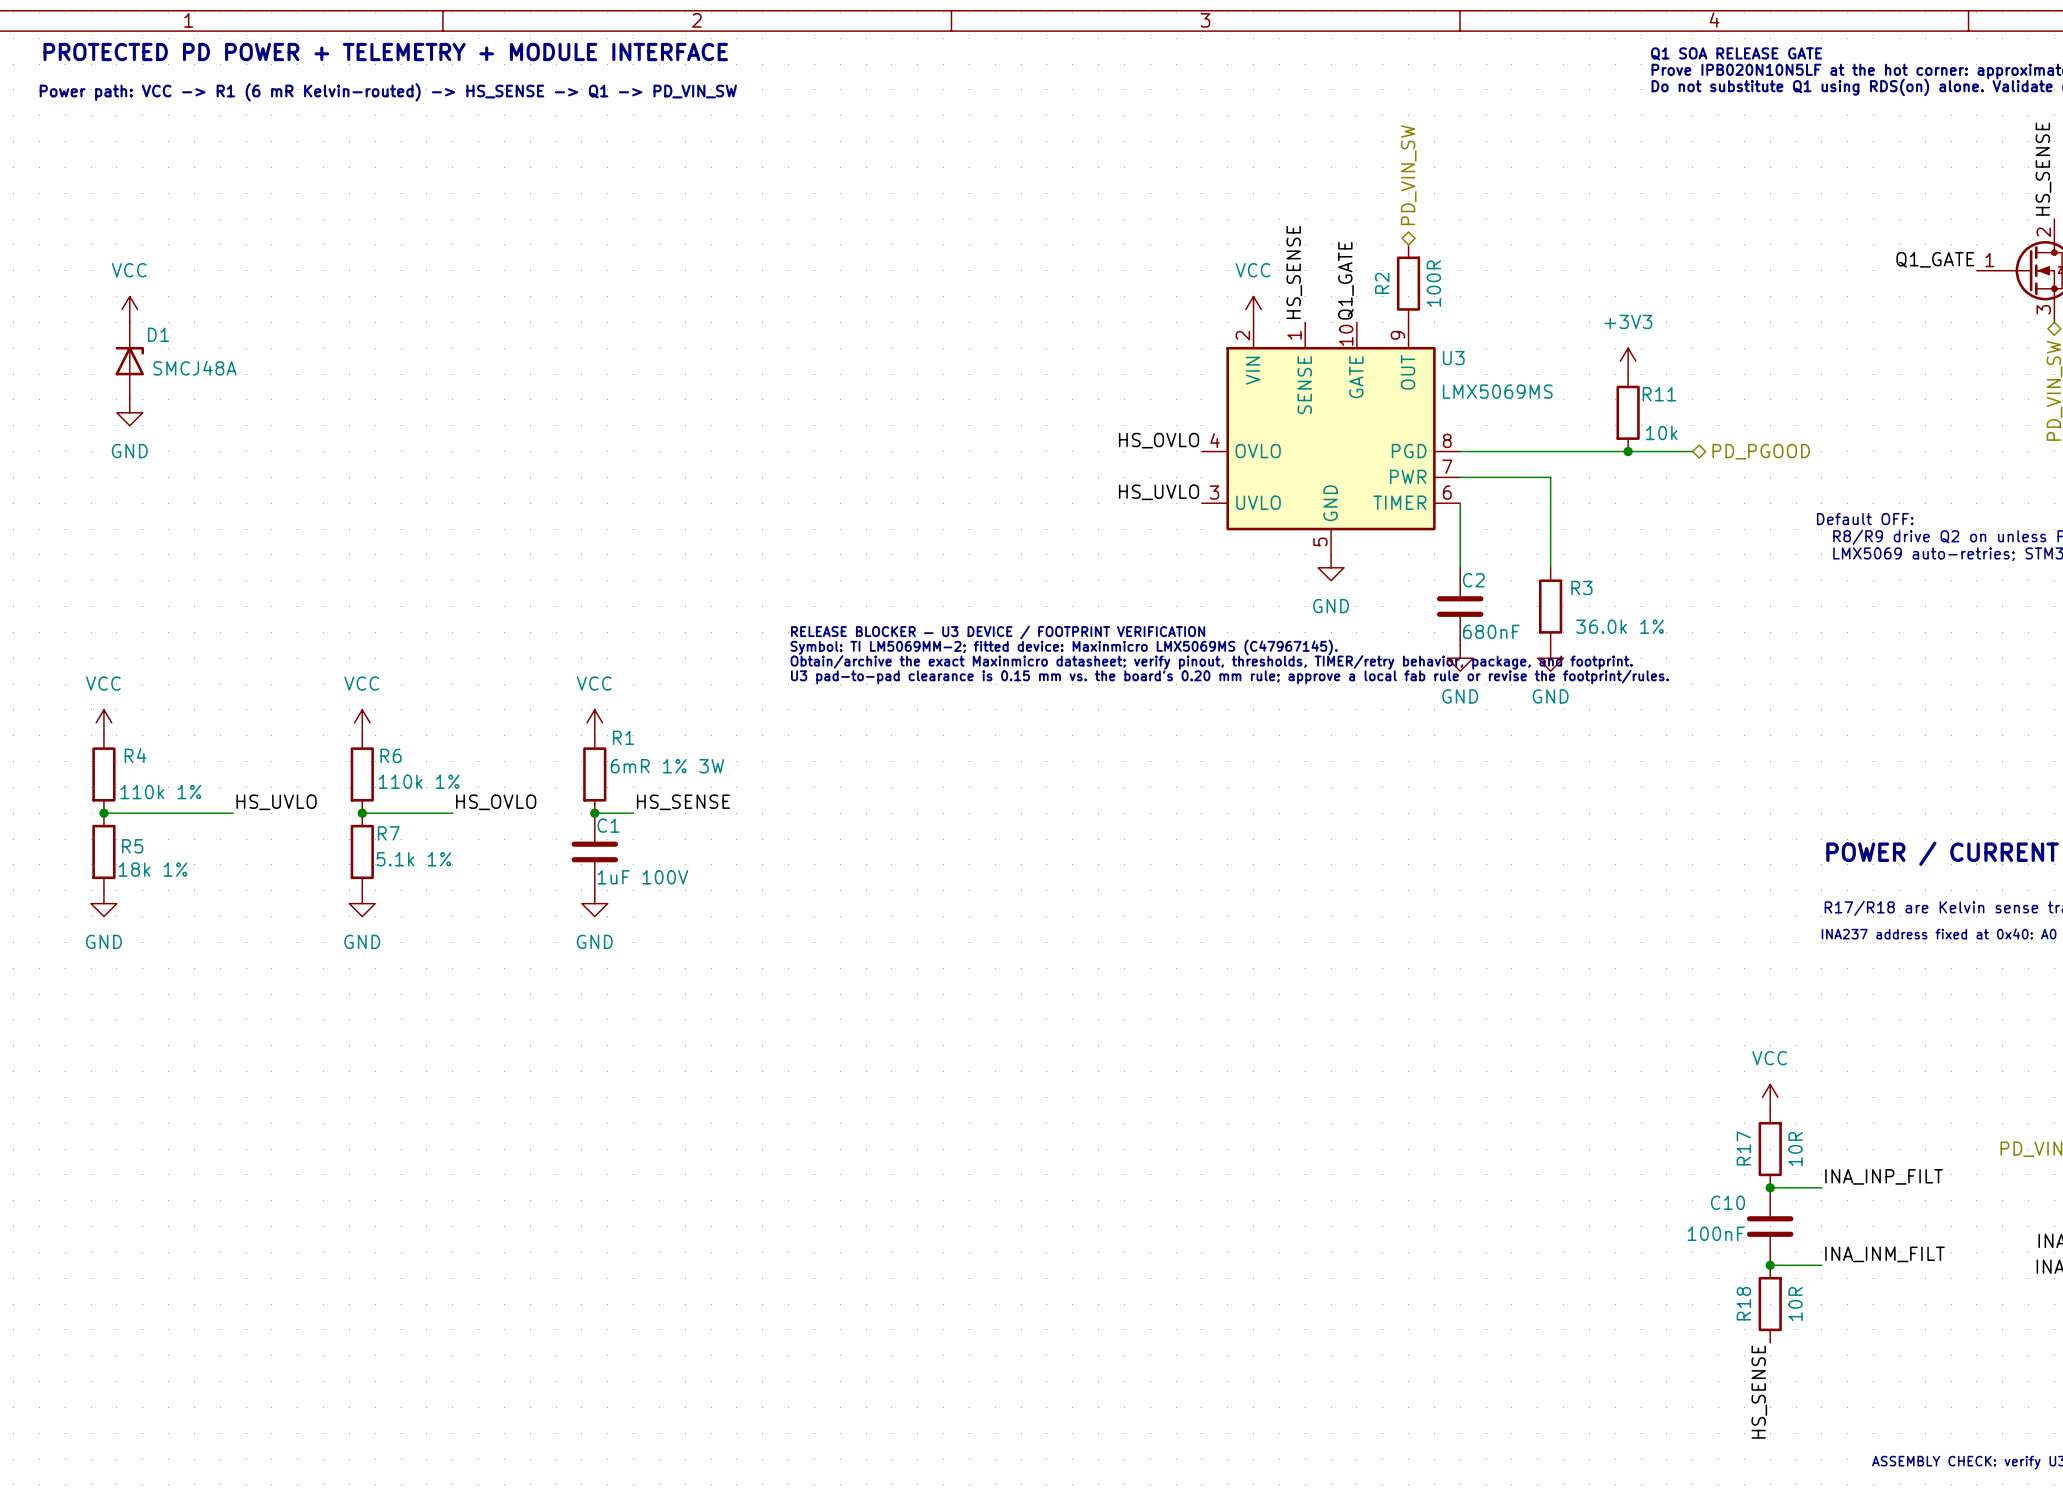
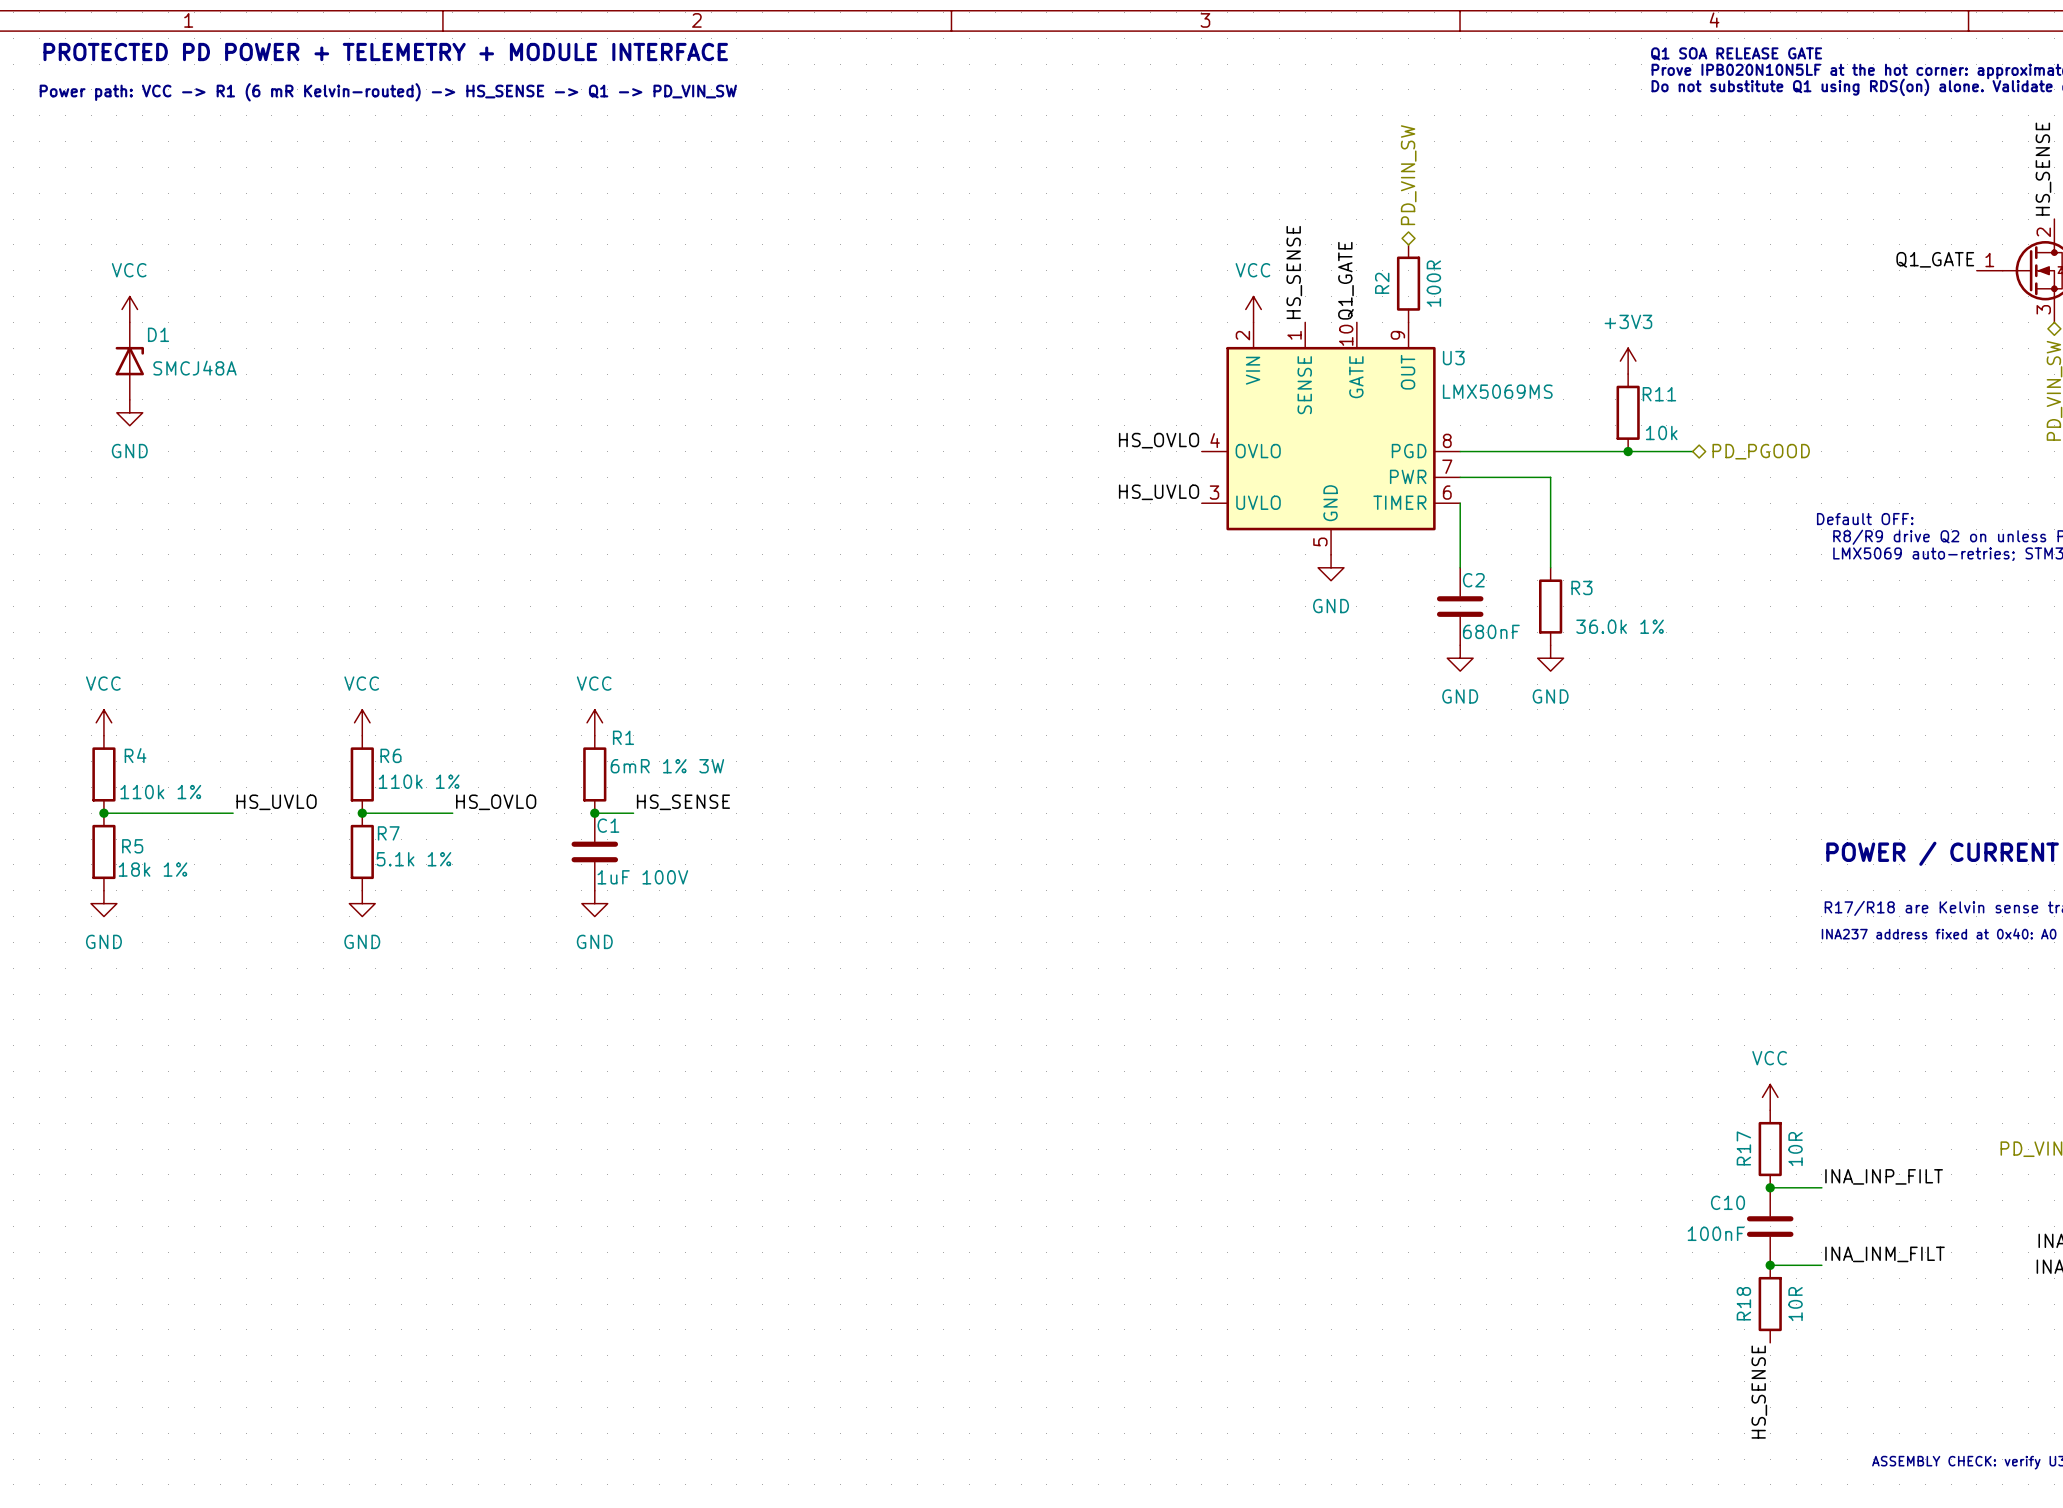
text: RELEASE BLOCKER — U3 DEVICE / FOOTPRINT VERIFICATION (998, 632) -> none
text: Symbol: TI LM5069MM-2; fitted device: Maxinmicro LMX5069MS (C47967145). (1064, 647) -> none
text: Obtain/archive the exact Maxinmicro datasheet; verify pinout, thresholds, TIMER/retry behavior, package, and footprint. (1211, 662) -> none
text: U3 pad-to-pad clearance is 0.15 mm vs. the board's 0.20 mm rule; approve a local fab rule or revise the footprint/rules. (1229, 677) -> none

